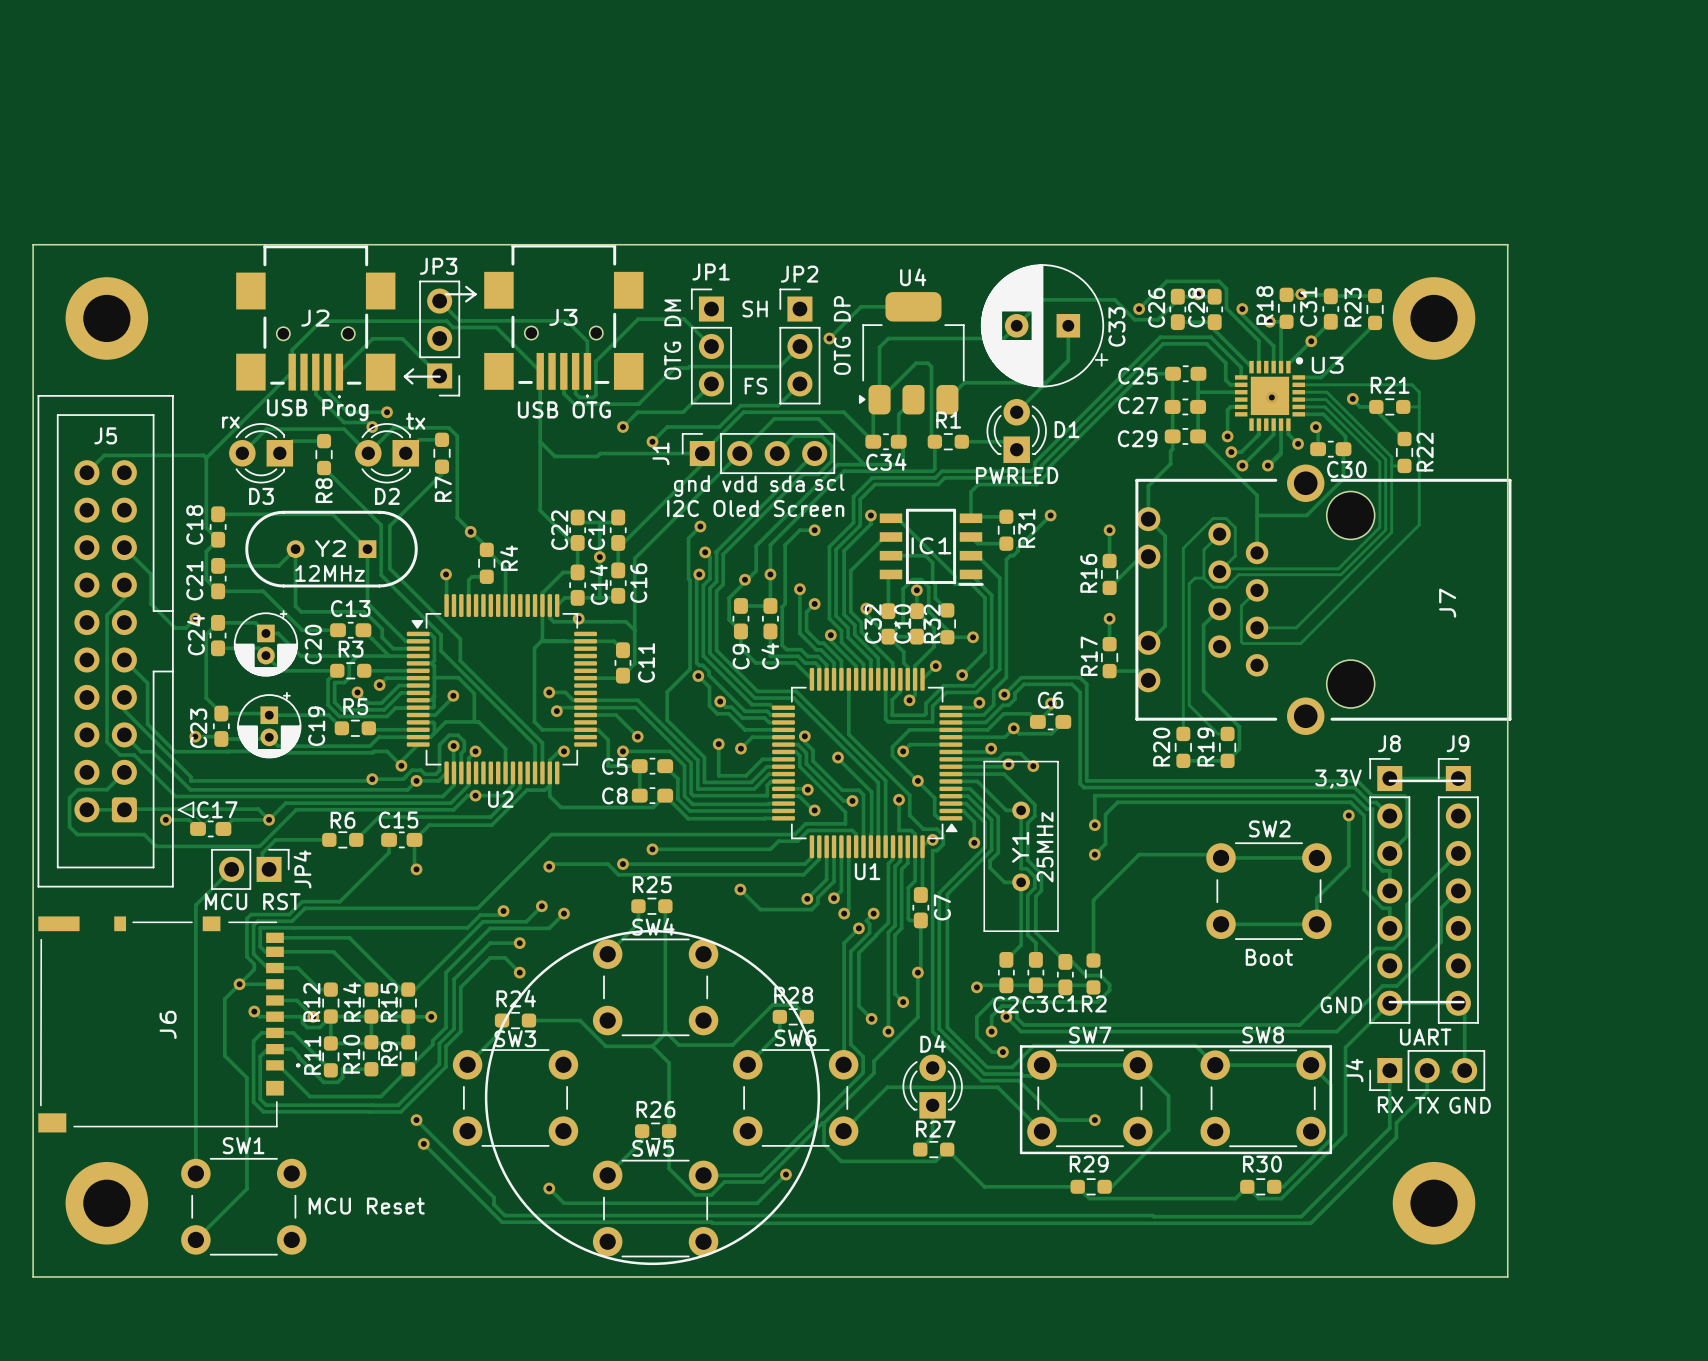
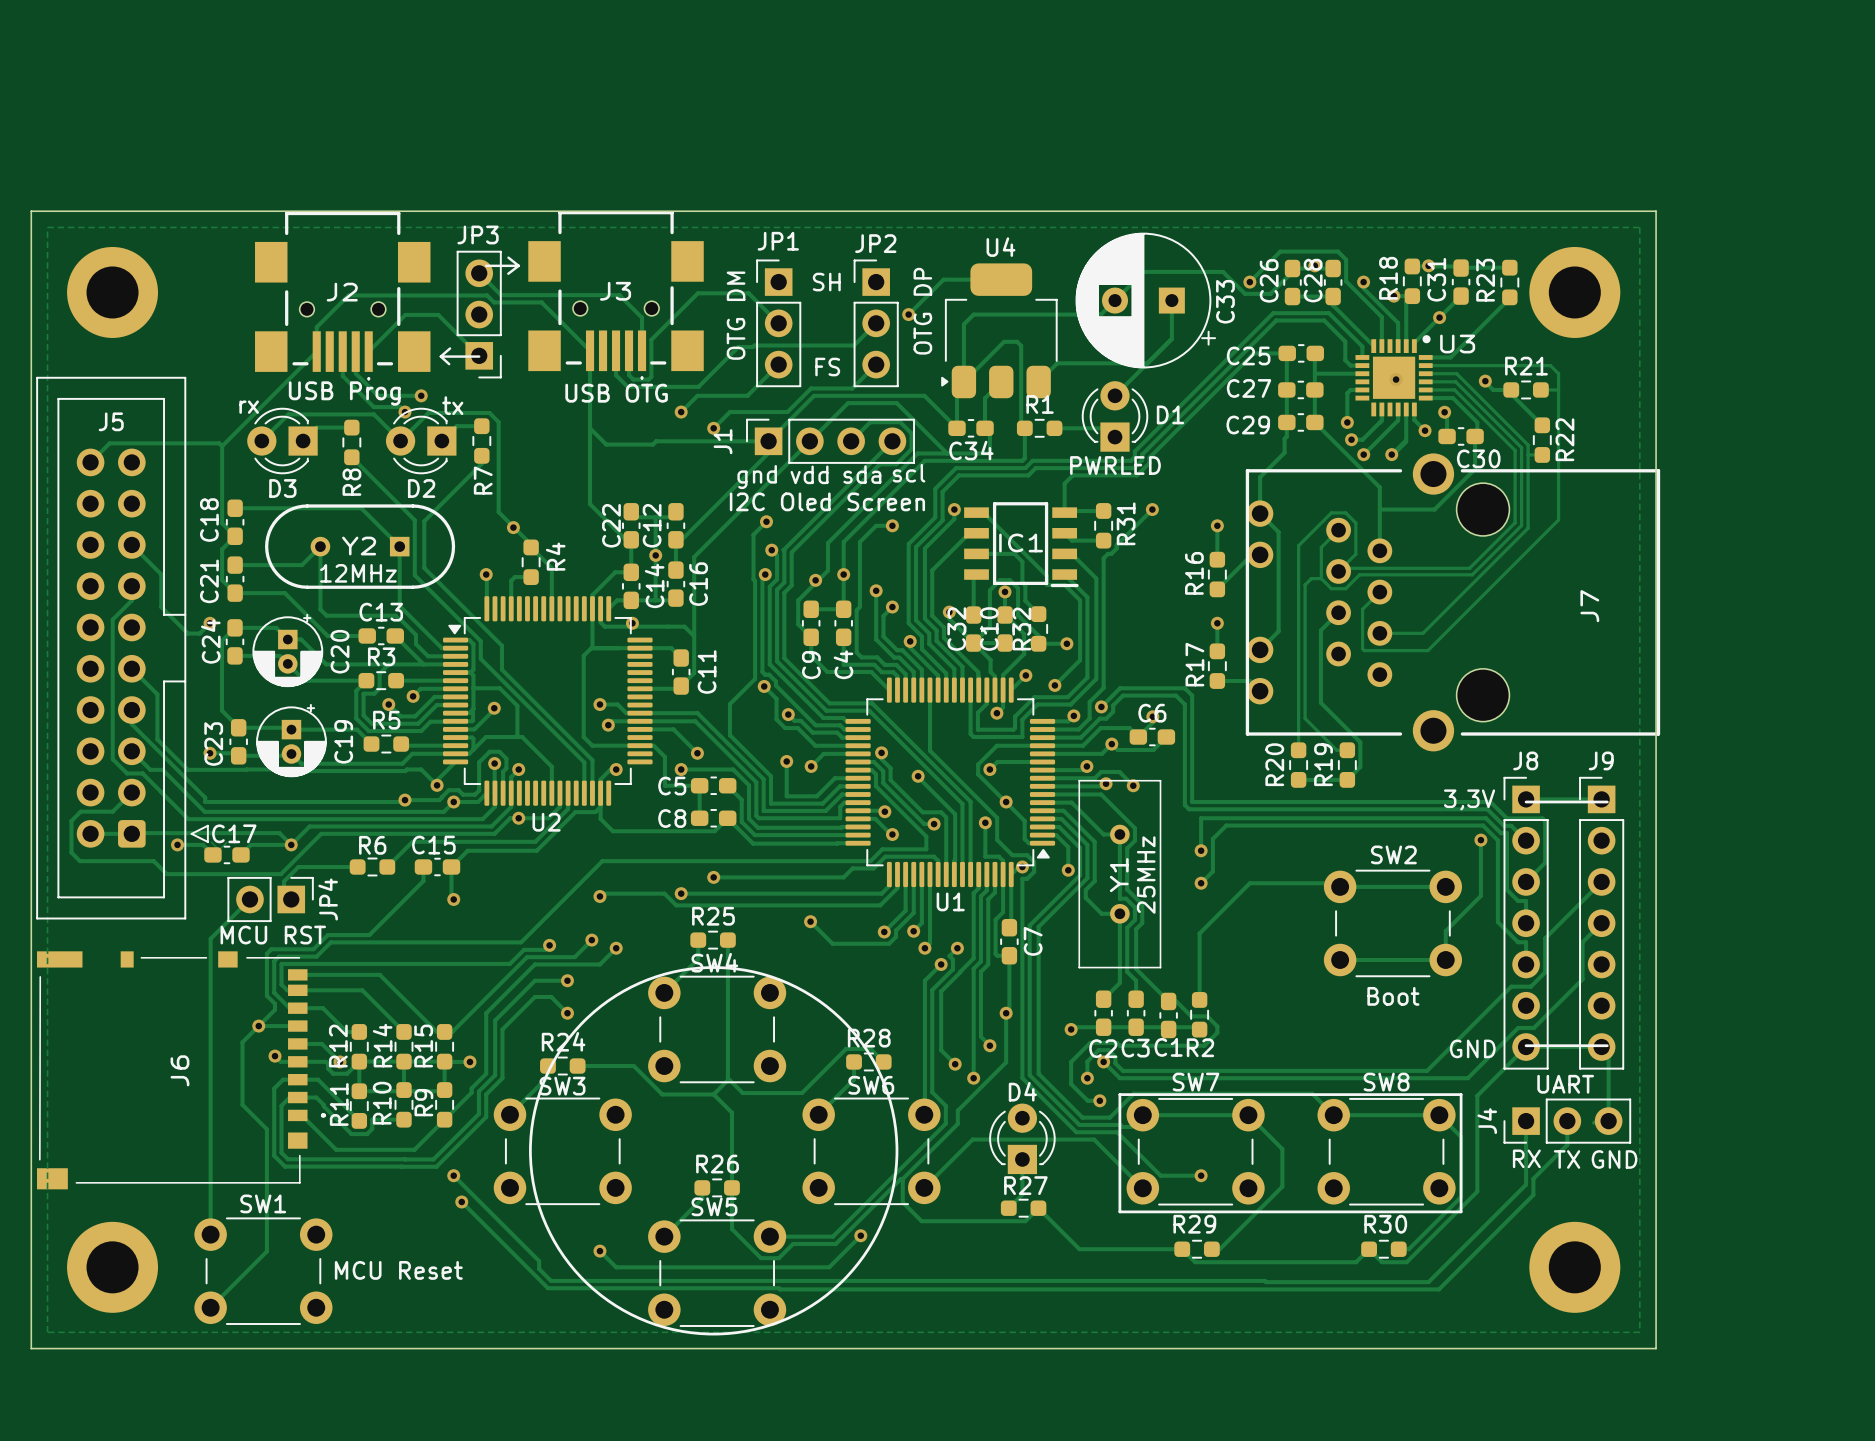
zone outline: none -> (47, 227) (1639, 227) (1639, 1332) (47, 1332) (47, 227)

